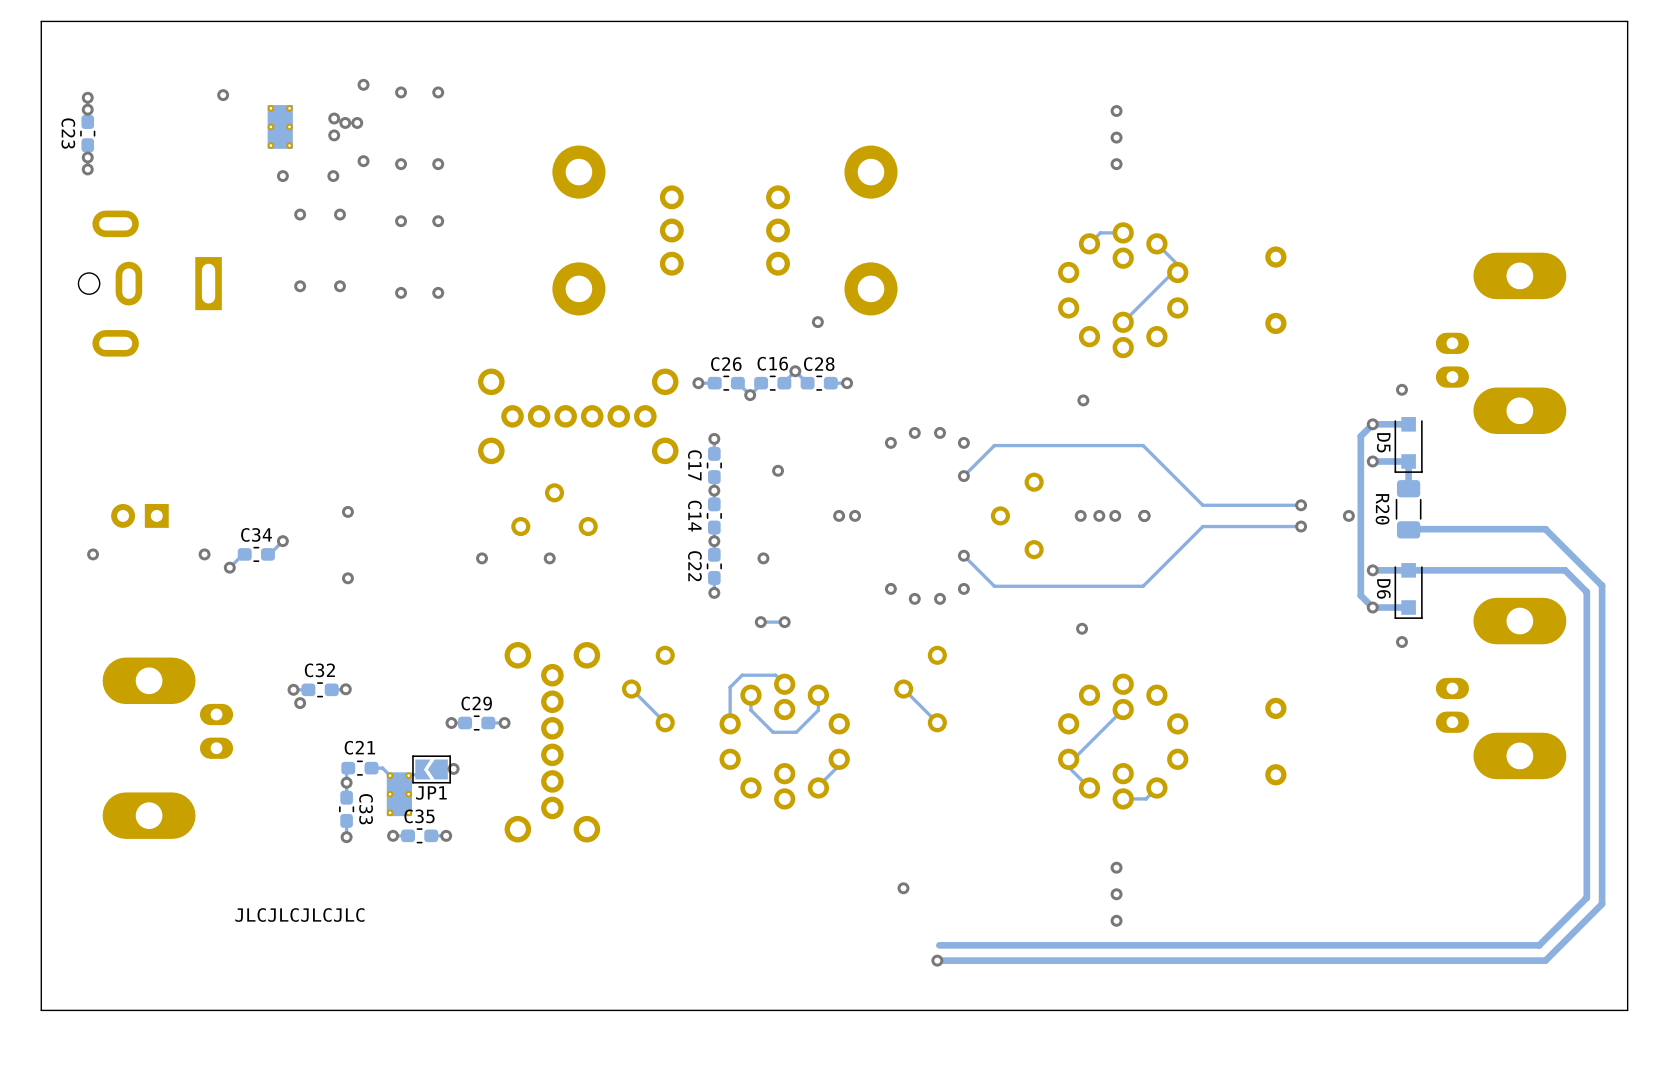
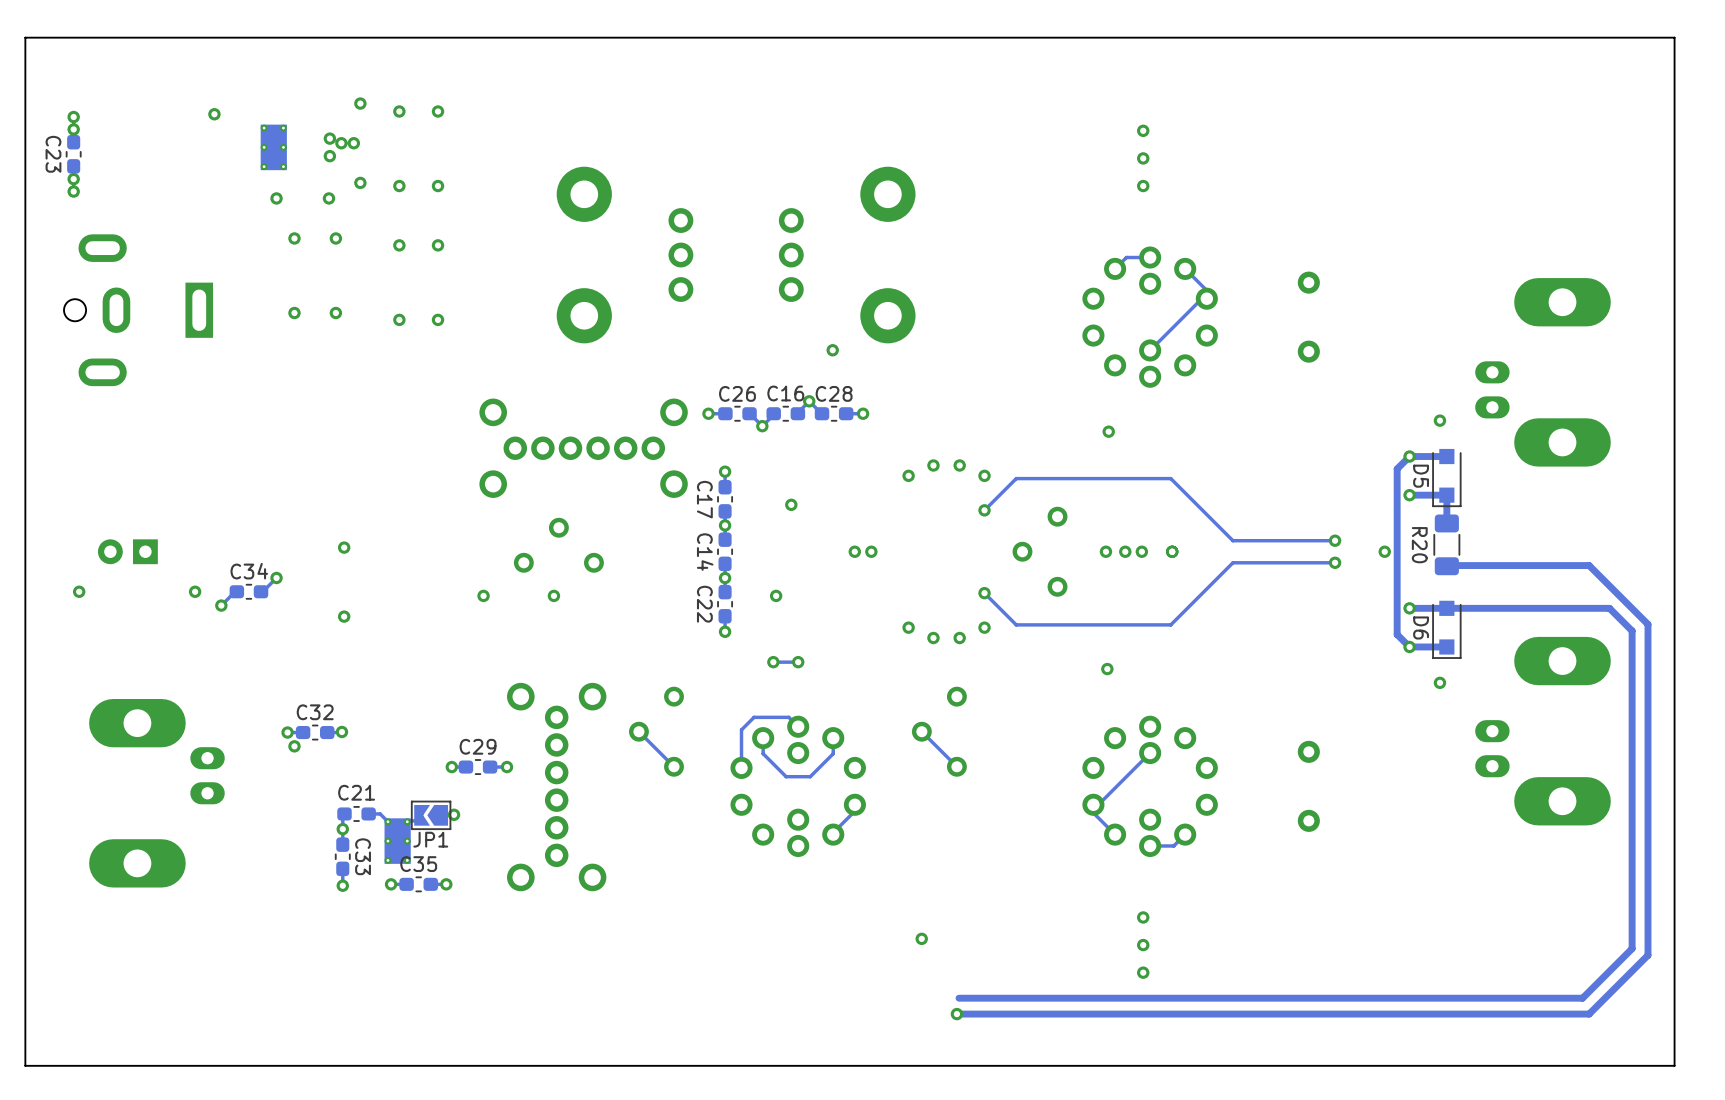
text: JLCJLCJLCJLC (299, 915) -> none

